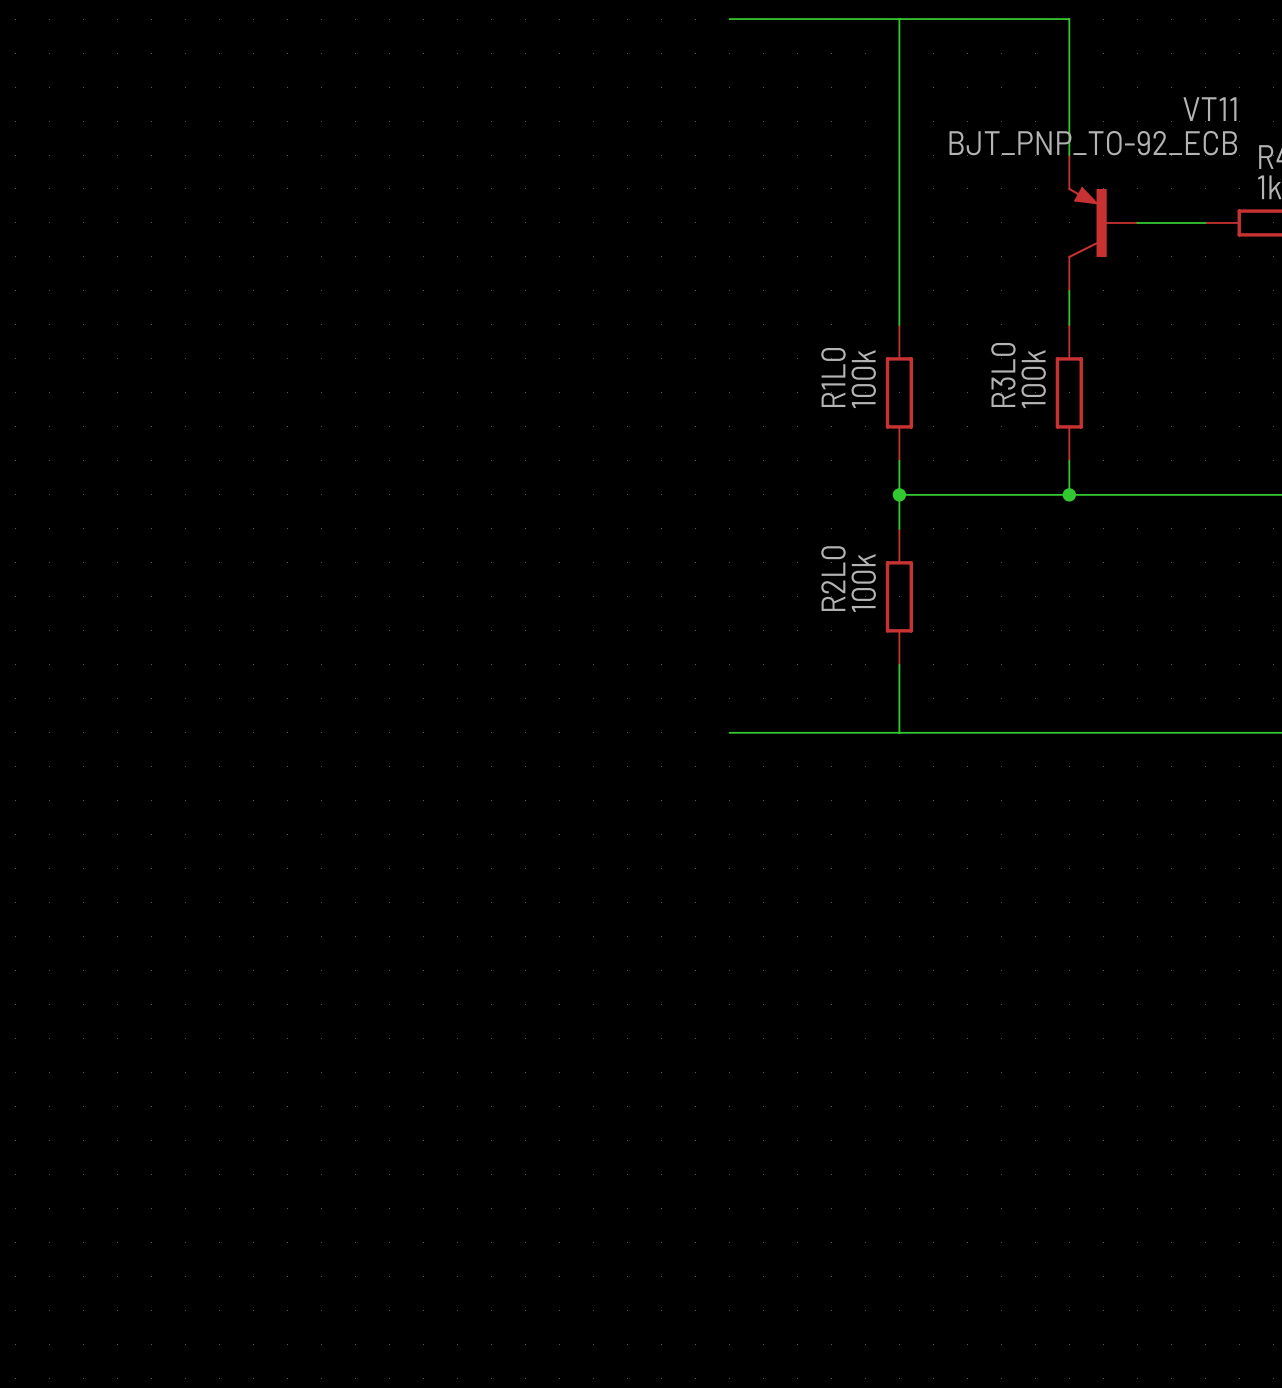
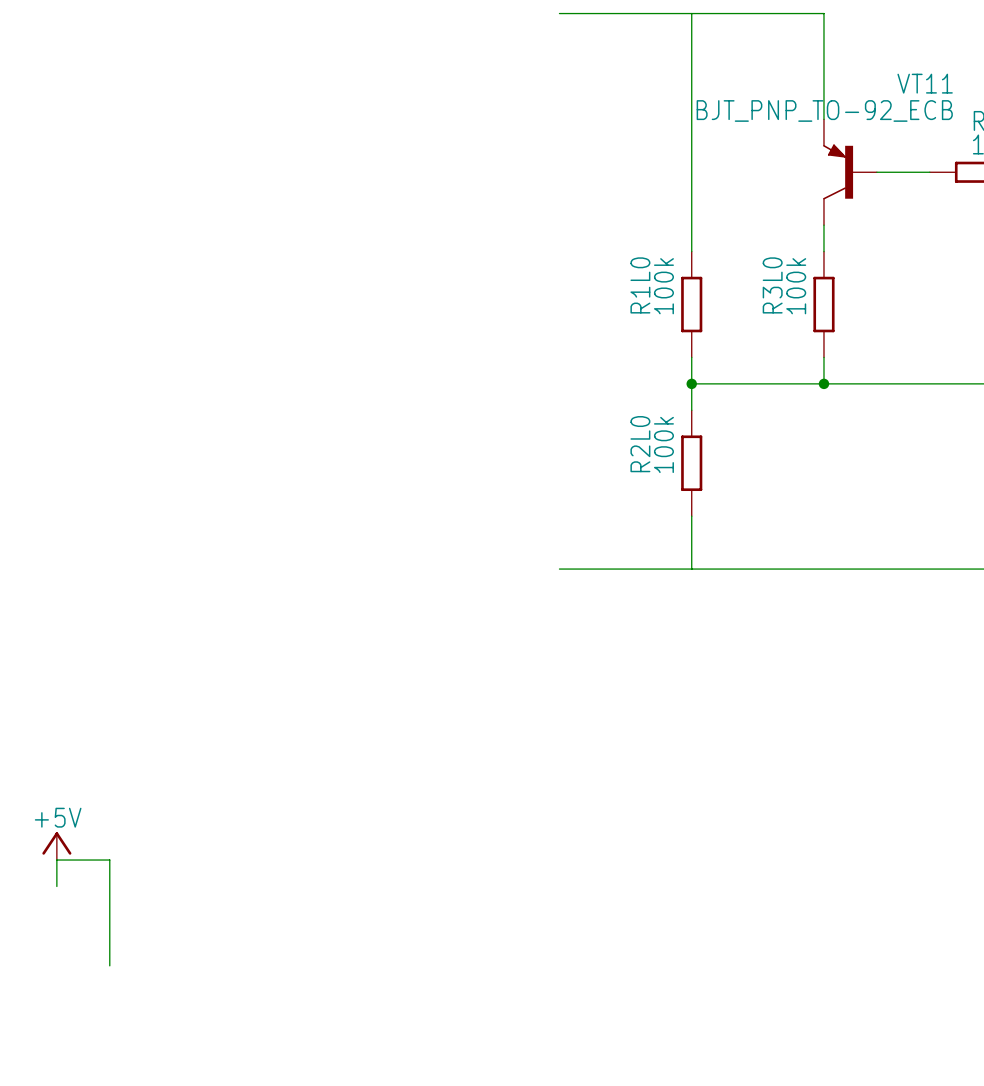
power symbol: none -> +5V (56, 846)
wire: none -> (56, 886) (56, 860) (109, 860) (109, 965)

